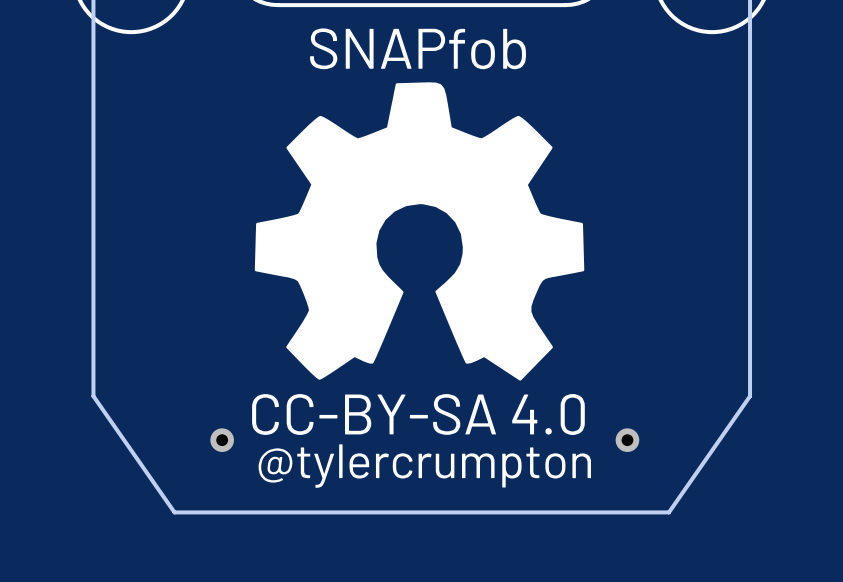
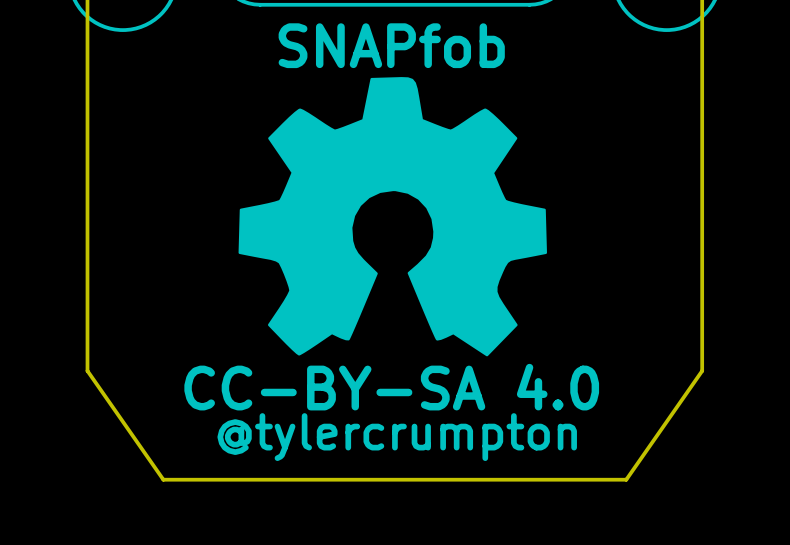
via: (222, 440) -> none
via: (627, 440) -> none

